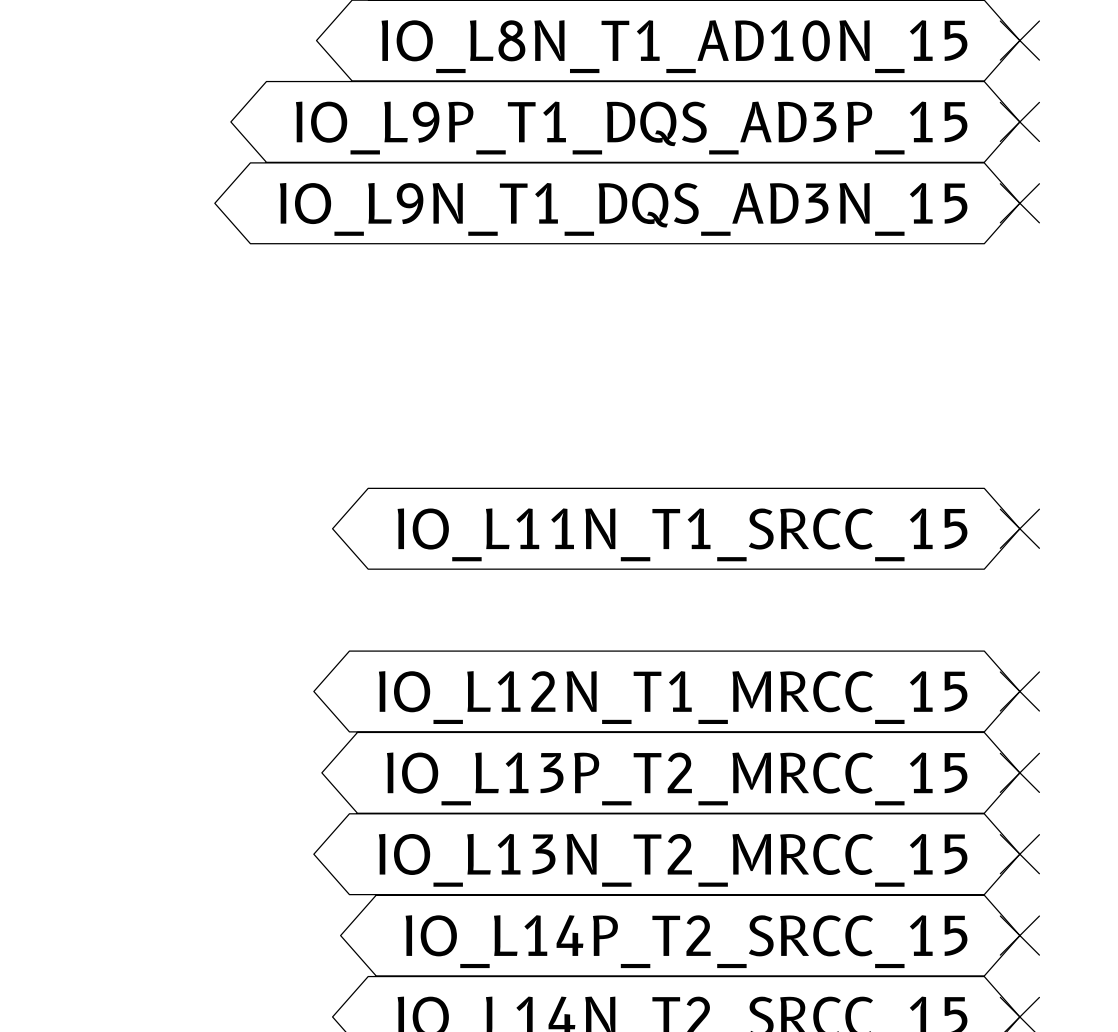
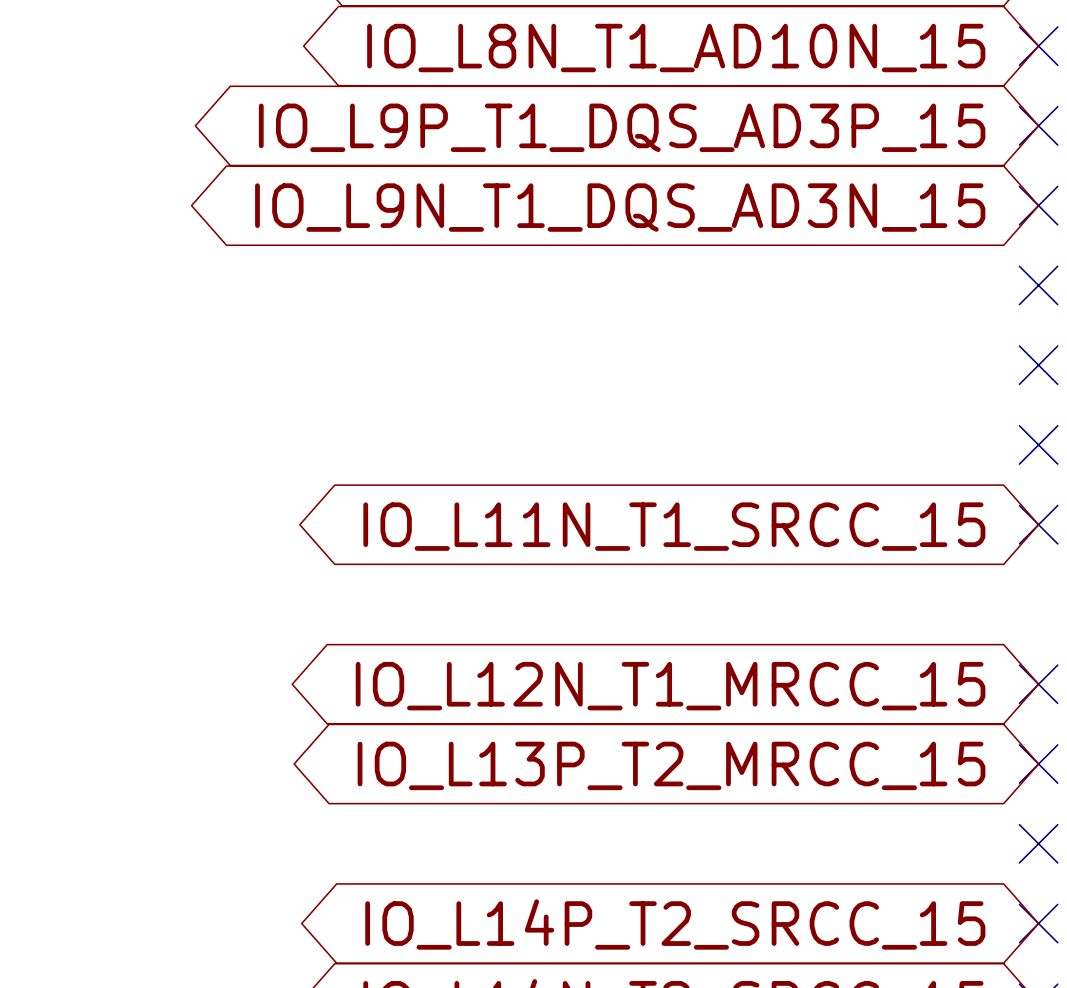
no-connect mark: none -> (1038, 285)
no-connect mark: none -> (1038, 365)
no-connect mark: none -> (1038, 444)
global label: IO_L13N_T2_MRCC_15 (673, 860) -> none

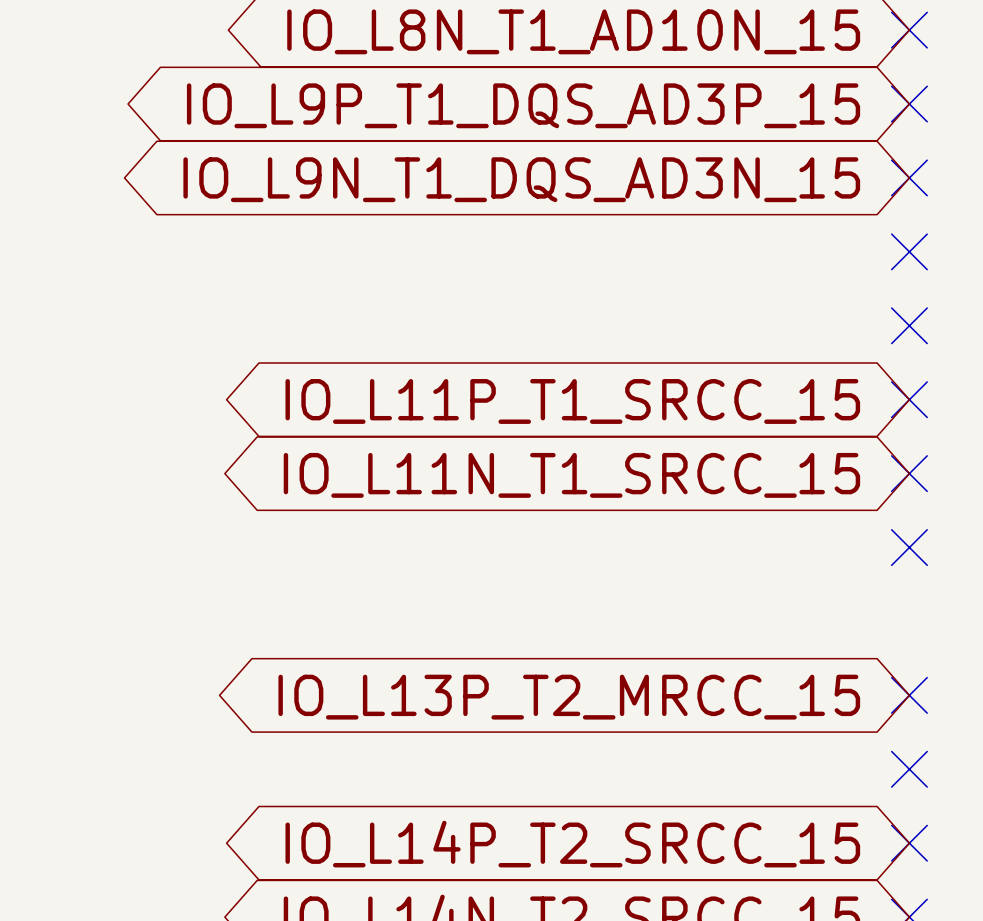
global label: none -> IO_L11P_T1_SRCC_15 (572, 401)
no-connect mark position: (1038, 684) -> (909, 547)
global label: IO_L12N_T1_MRCC_15 (670, 686) -> none

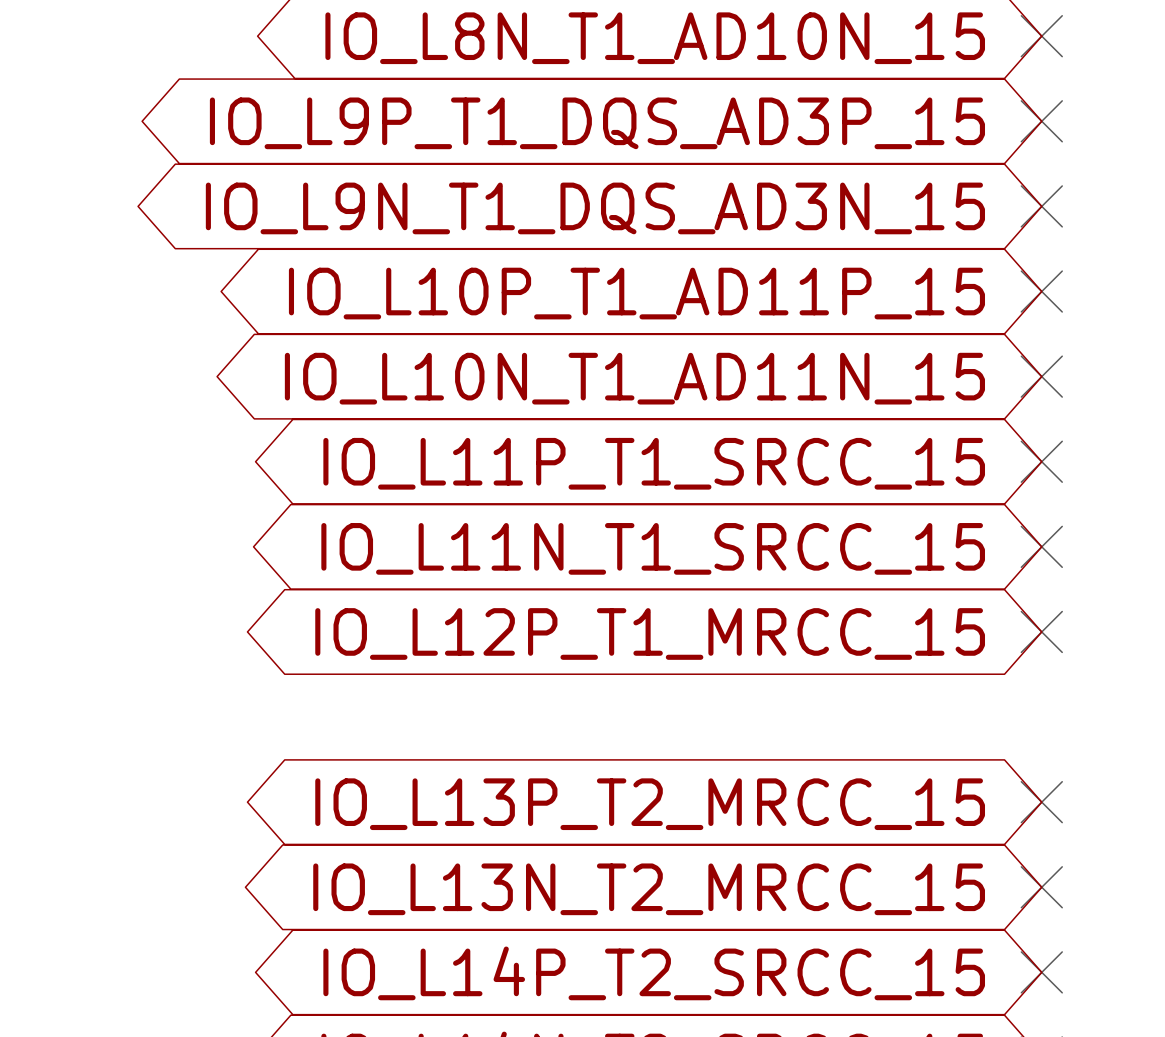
global label: none -> IO_L10P_T1_AD11P_15 (636, 293)
global label: none -> IO_L10N_T1_AD11N_15 (634, 378)
global label: none -> IO_L12P_T1_MRCC_15 (650, 633)
global label: none -> IO_L13N_T2_MRCC_15 (649, 889)

